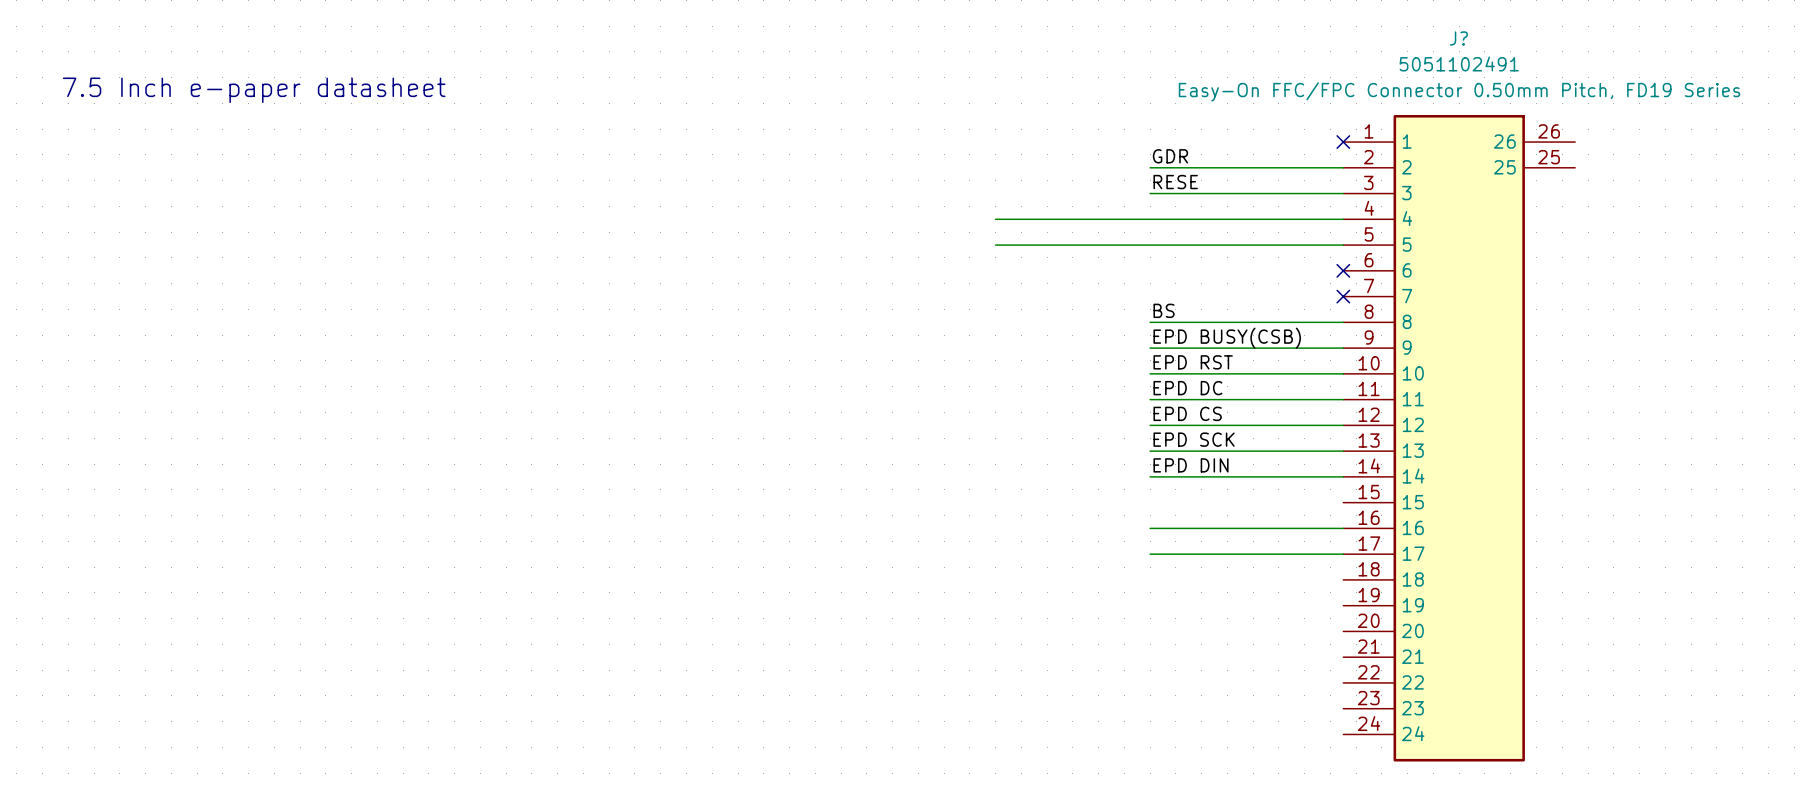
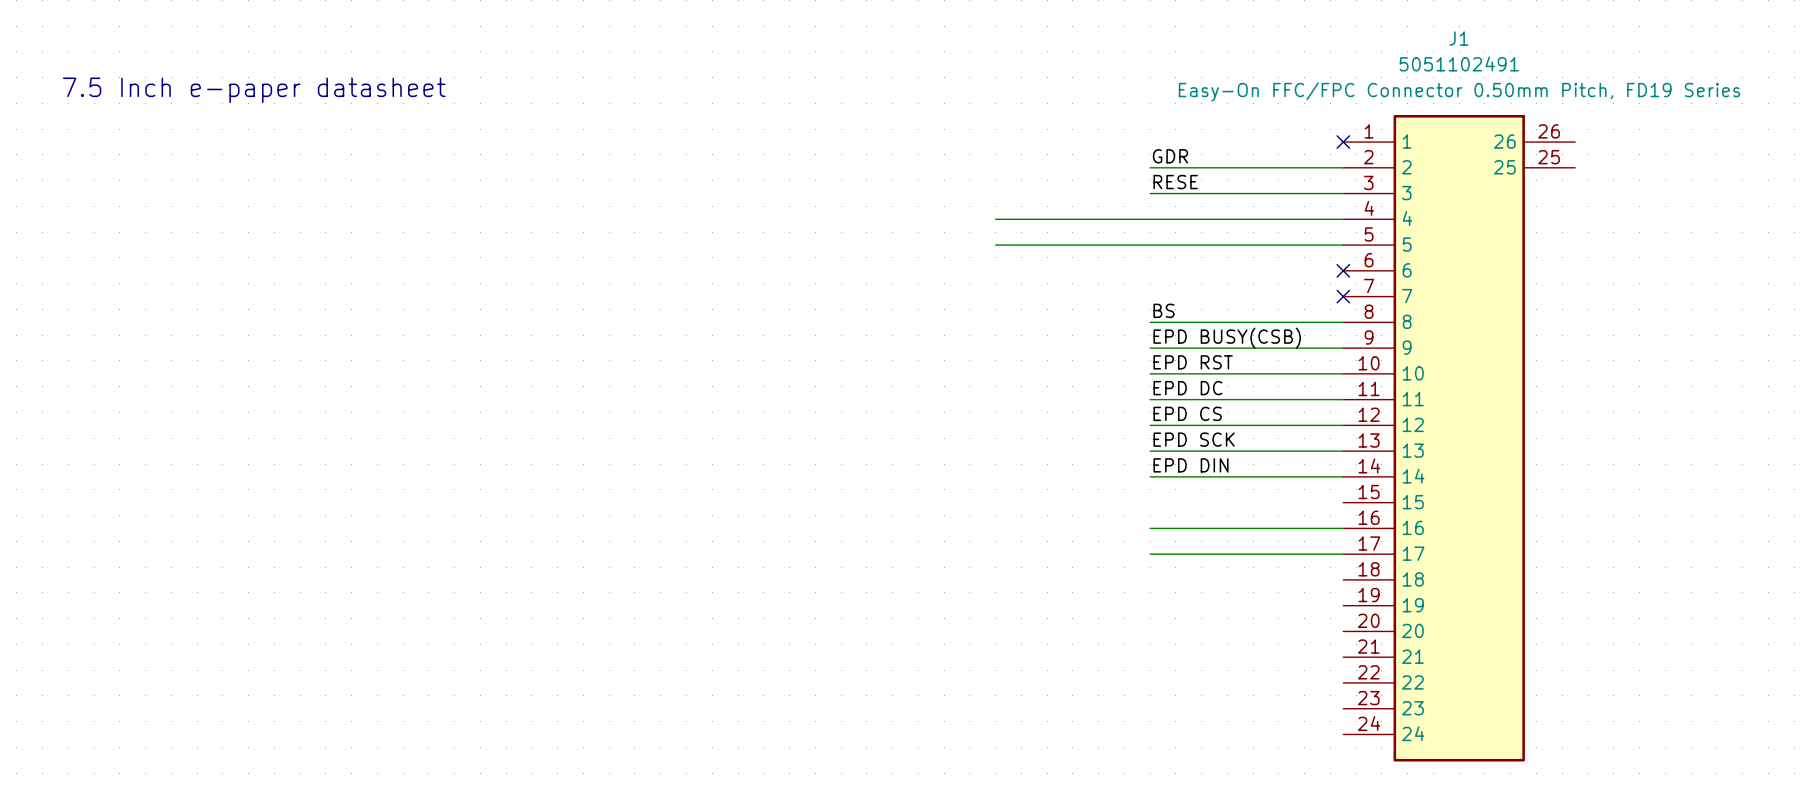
J? name: J? (1458, 38) -> J1 (1458, 38)

